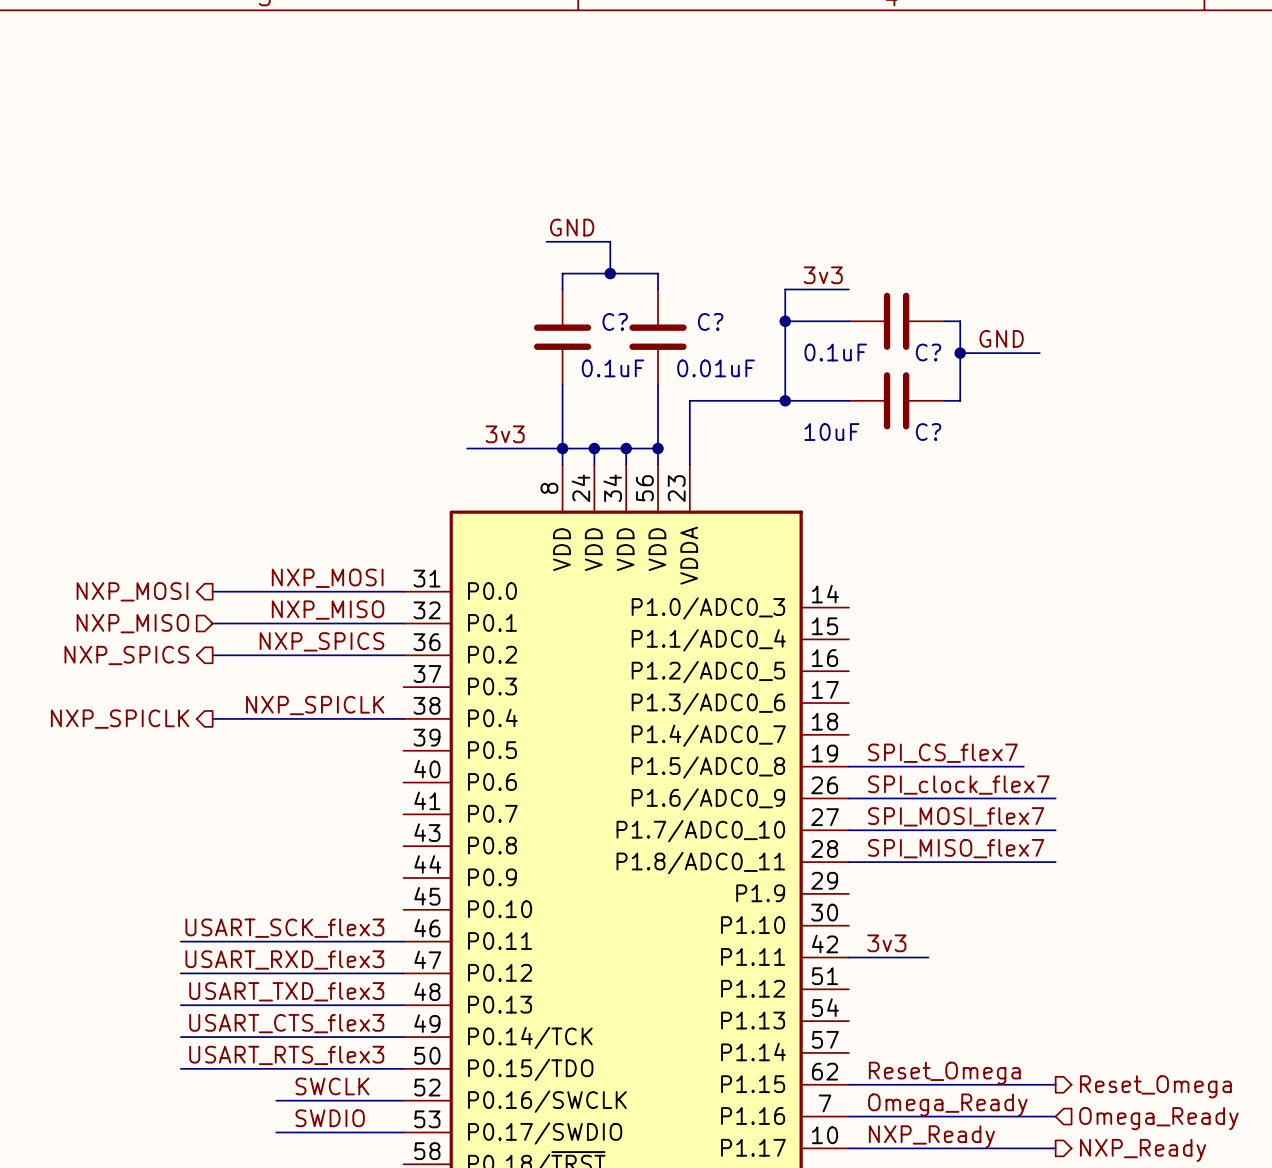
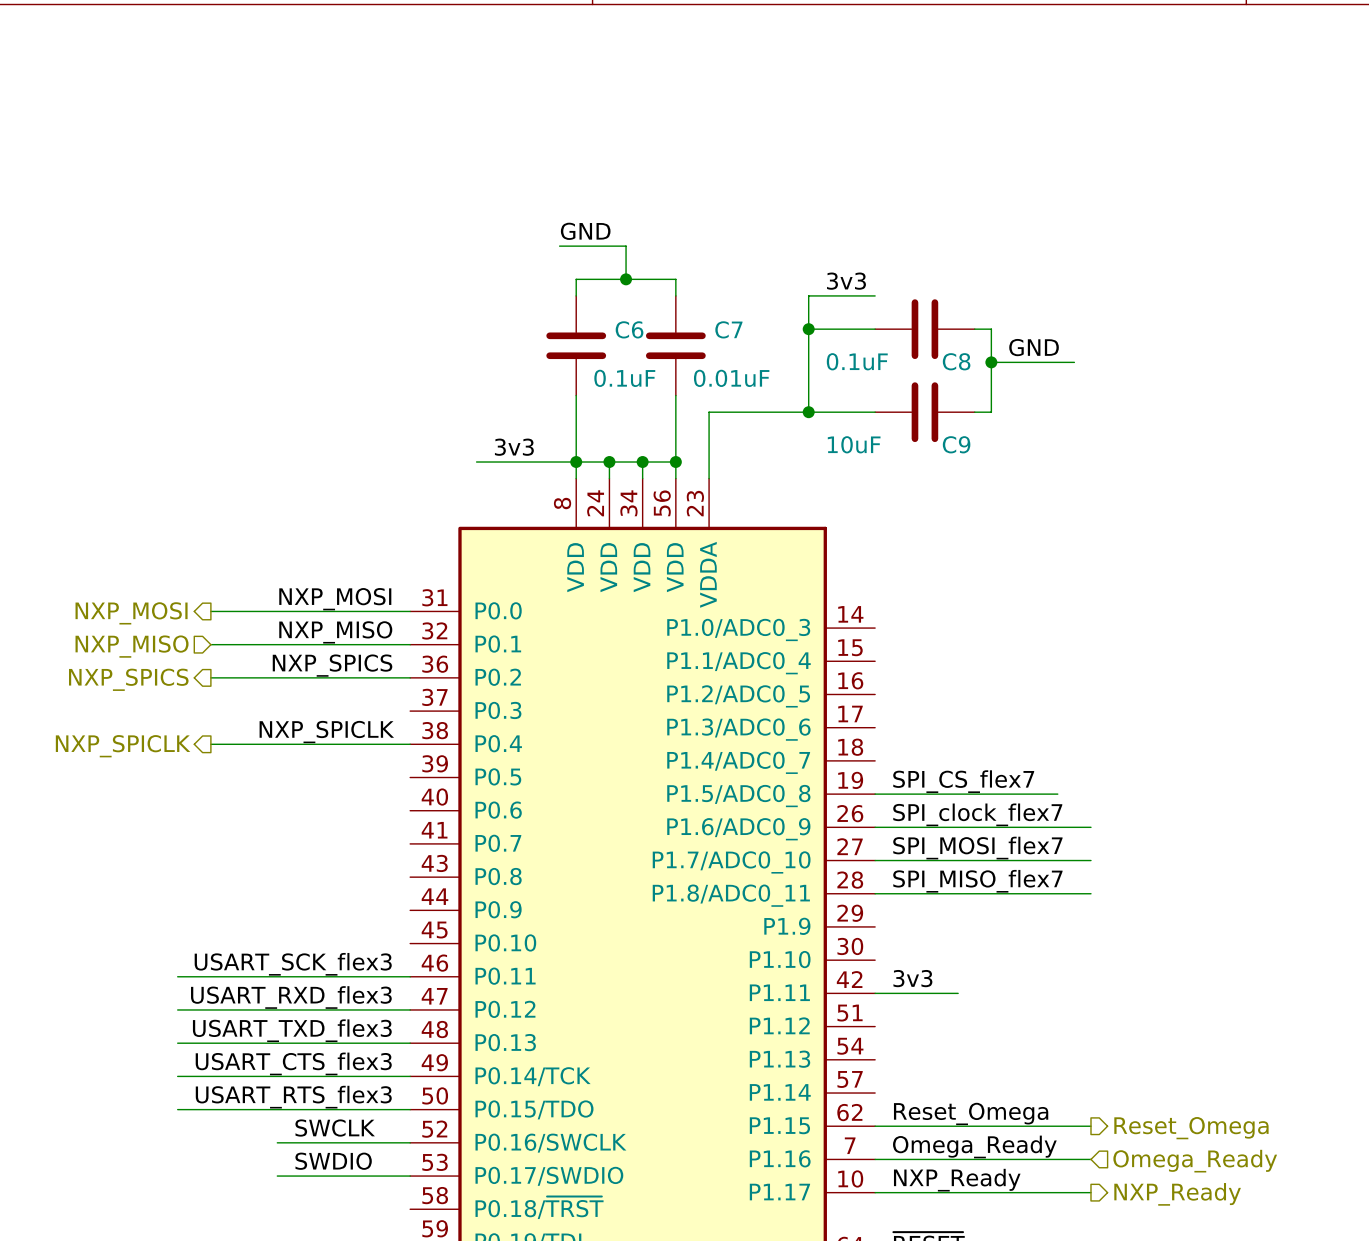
C? name: C? (615, 321) -> C6 (629, 329)
C? name: C? (710, 321) -> C7 (728, 329)
C? name: C? (928, 352) -> C8 (956, 361)
C? name: C? (928, 432) -> C9 (956, 444)

